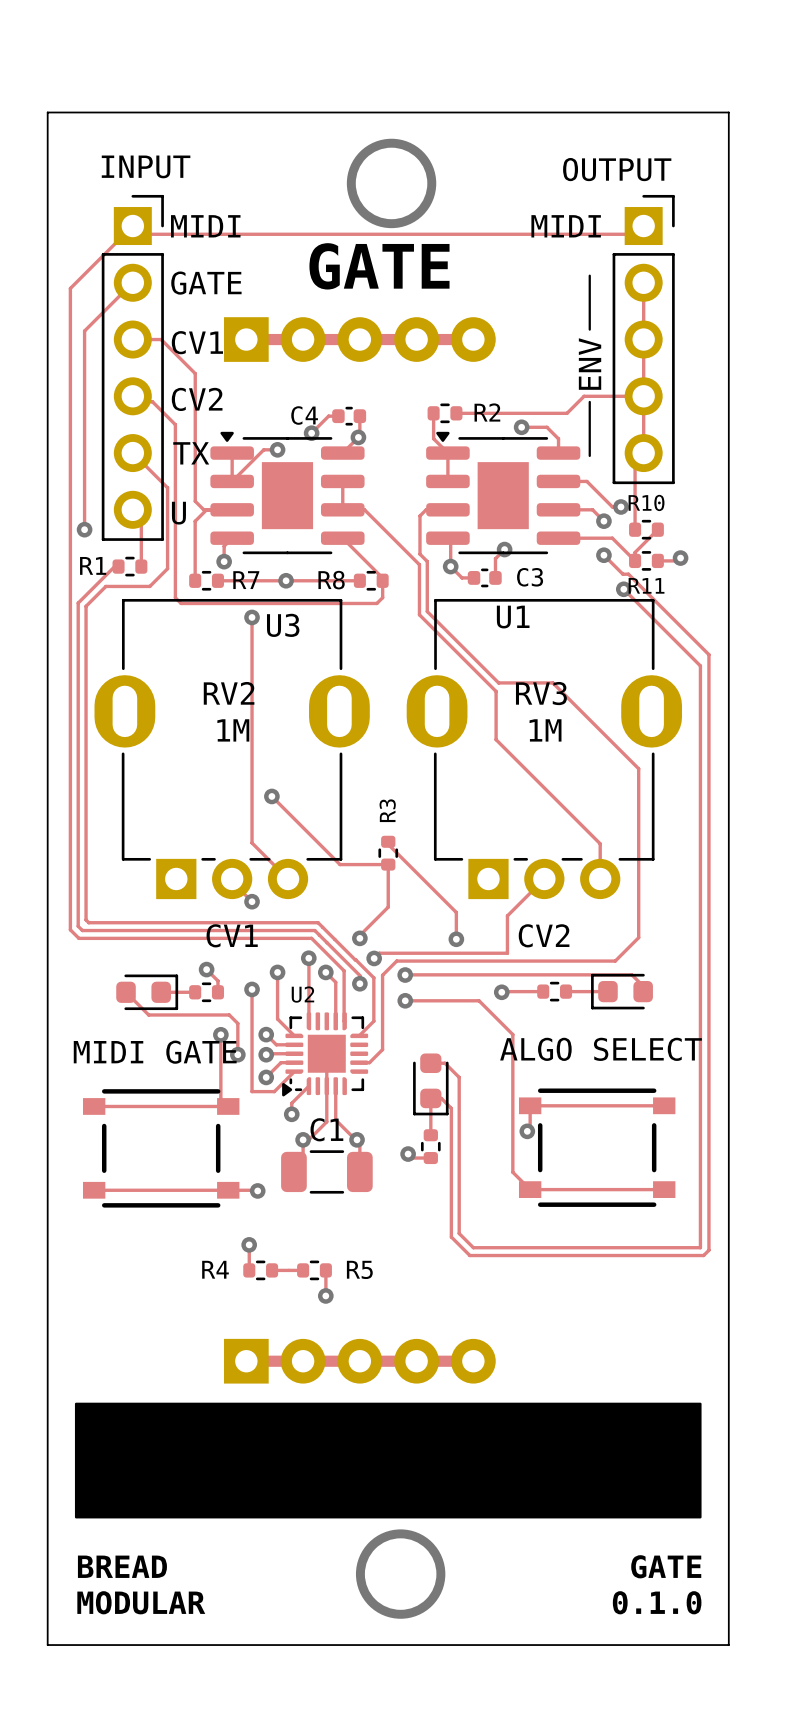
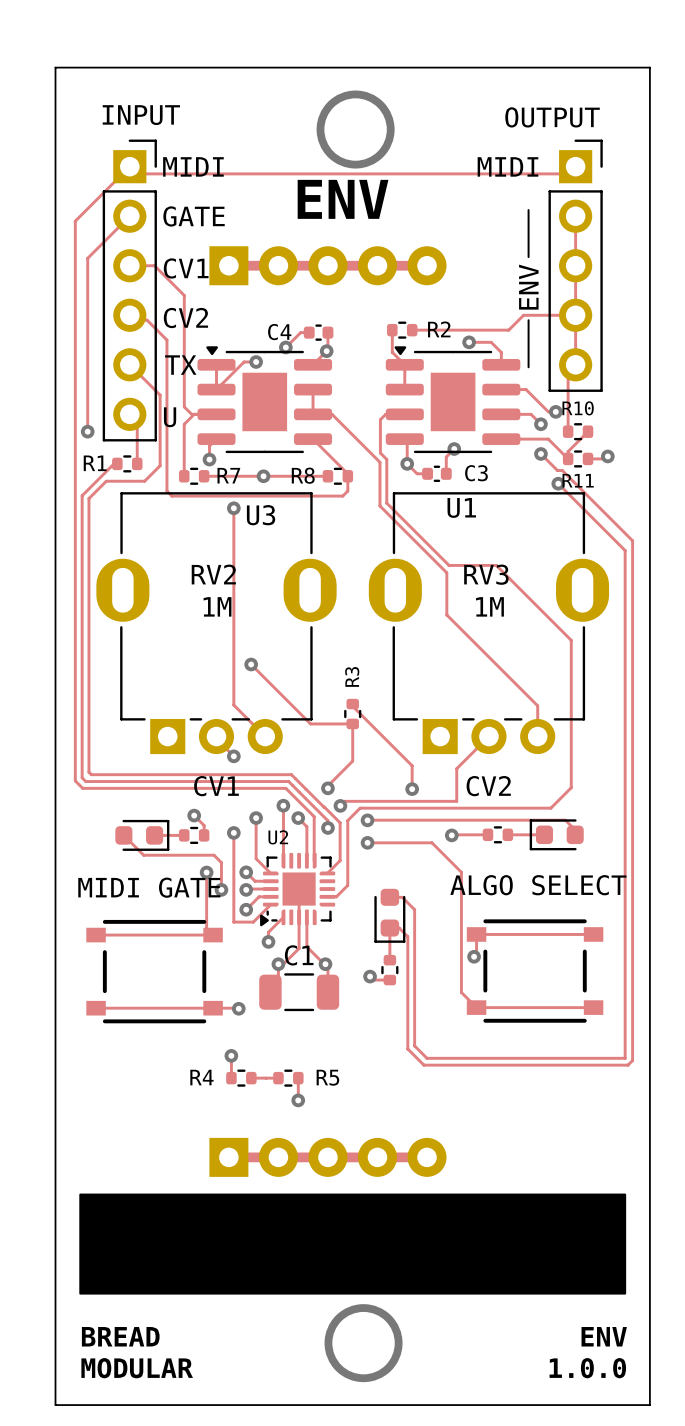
text: GATE (379, 266) -> ENV (343, 199)
text: GATE (666, 1566) -> ENV (604, 1336)
text: 0.1.0 (657, 1602) -> 1.0.0 (587, 1368)

